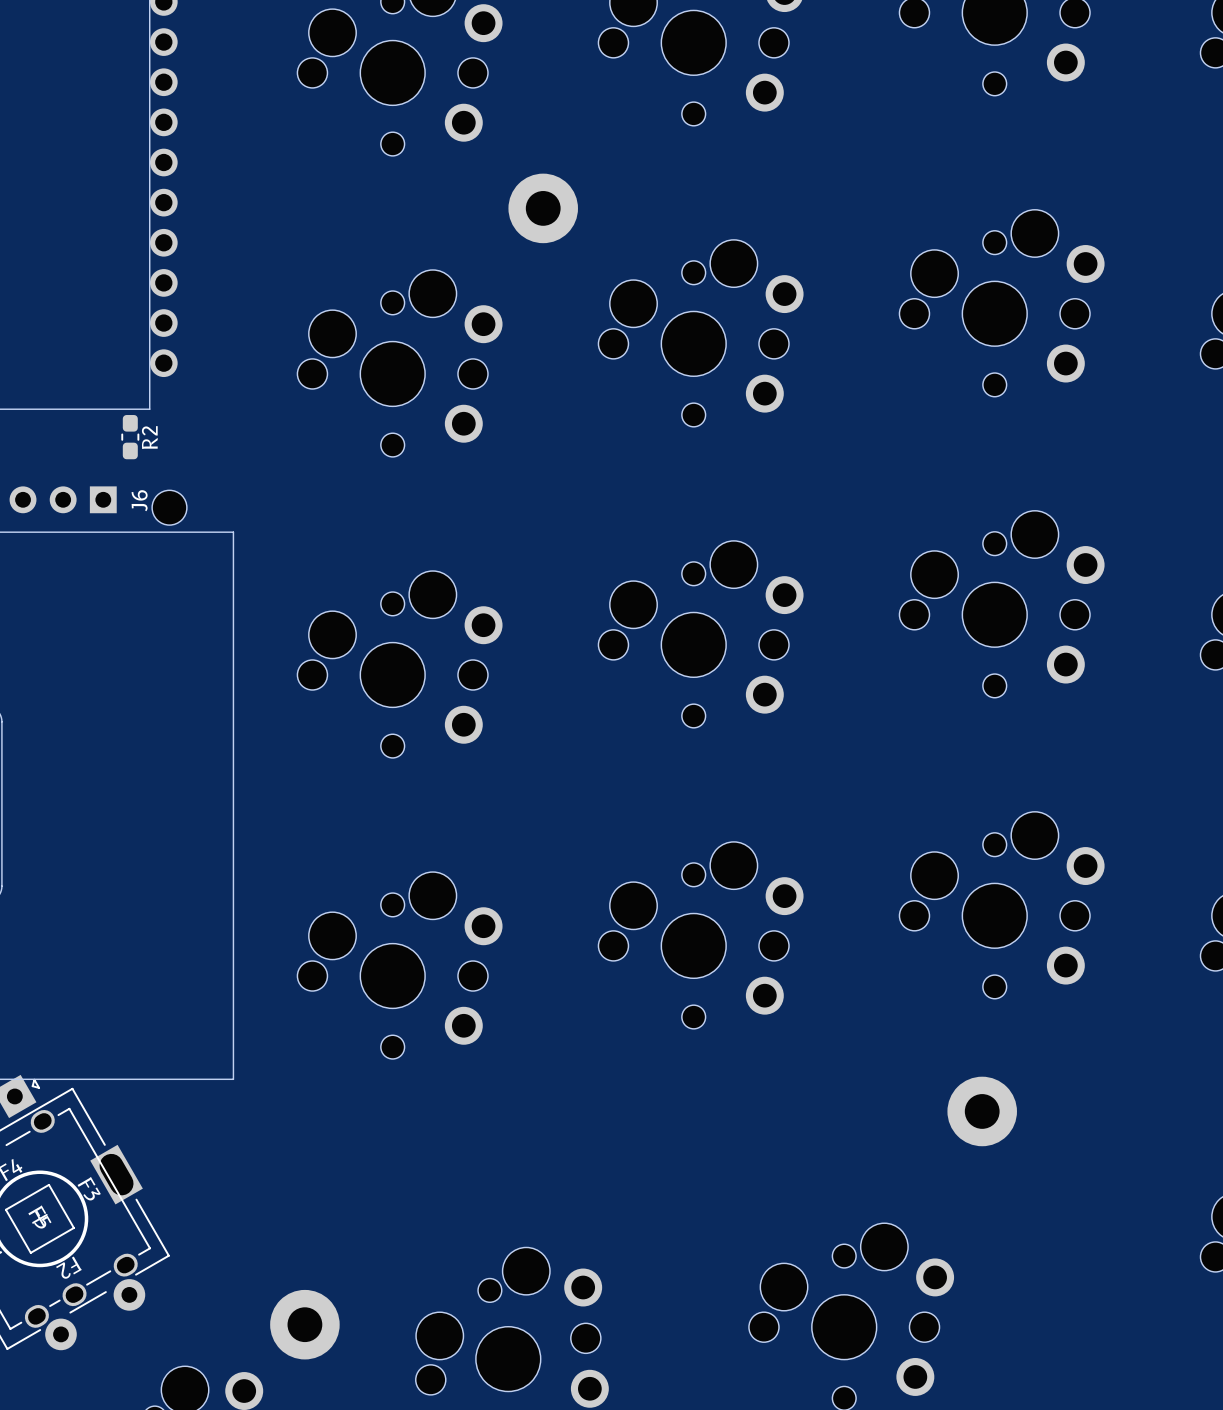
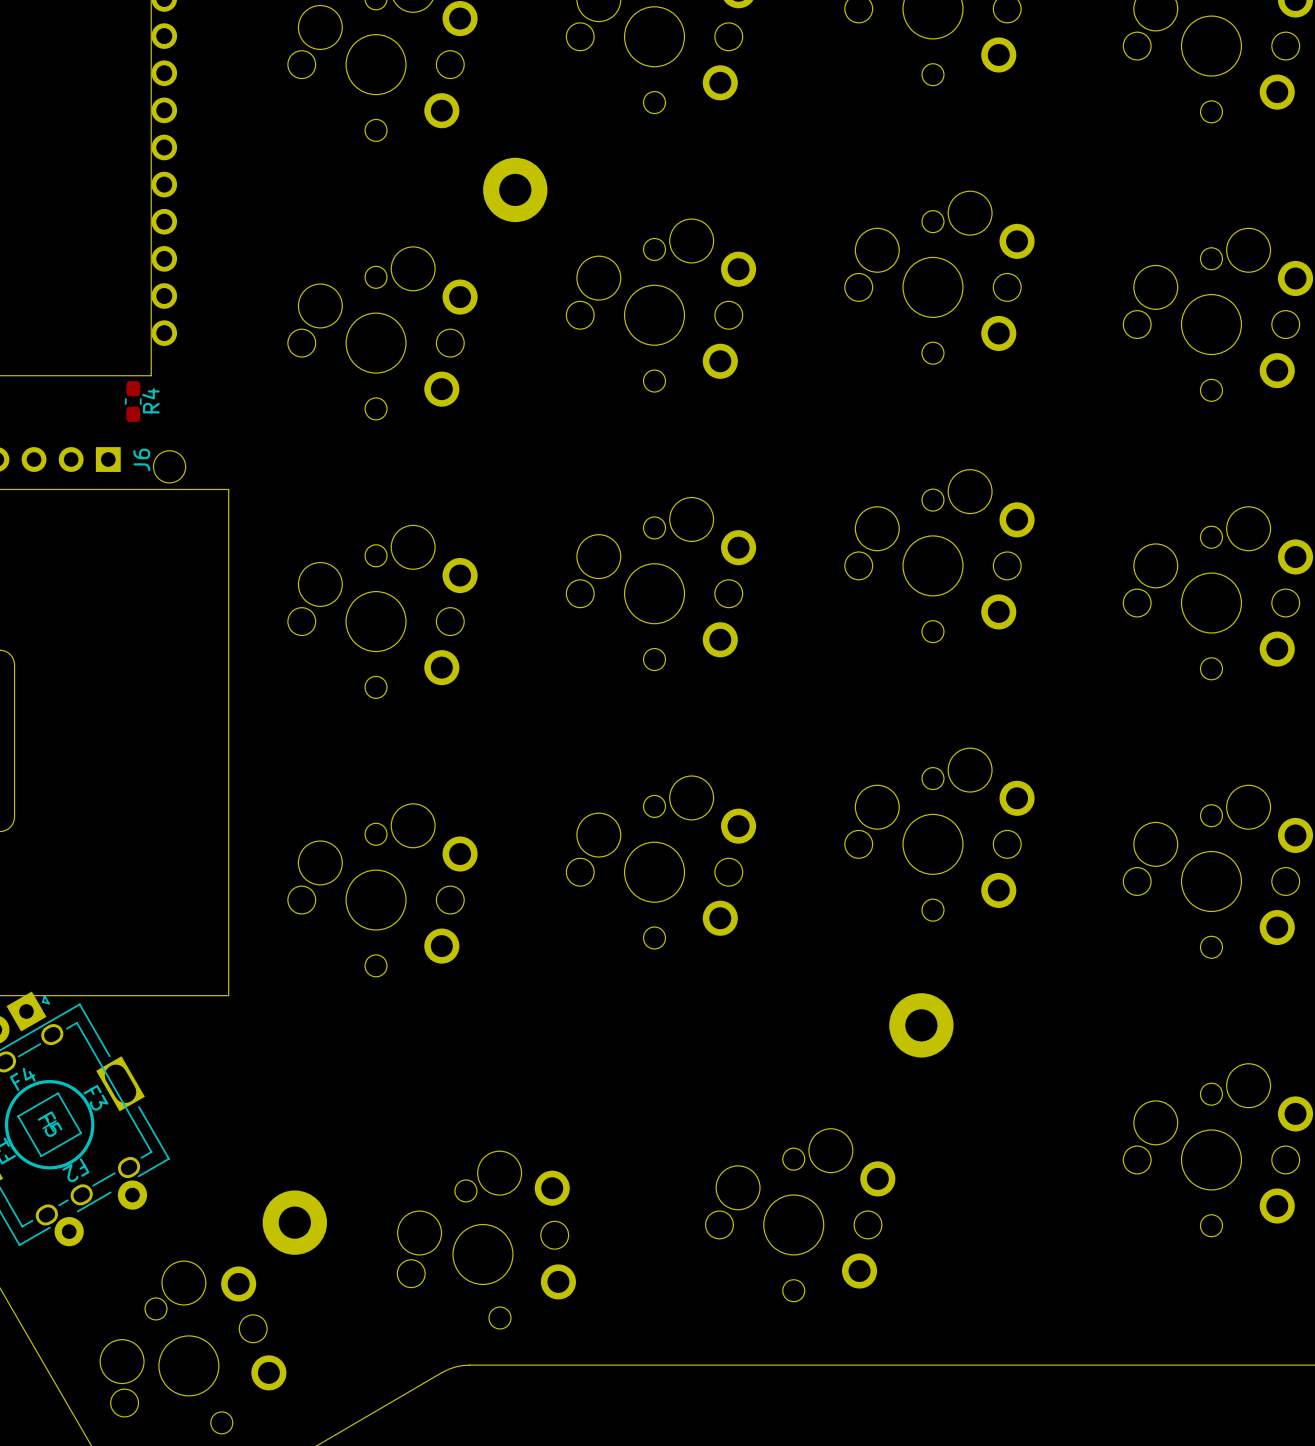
R2 name: R2 (149, 437) -> R4 (150, 400)

